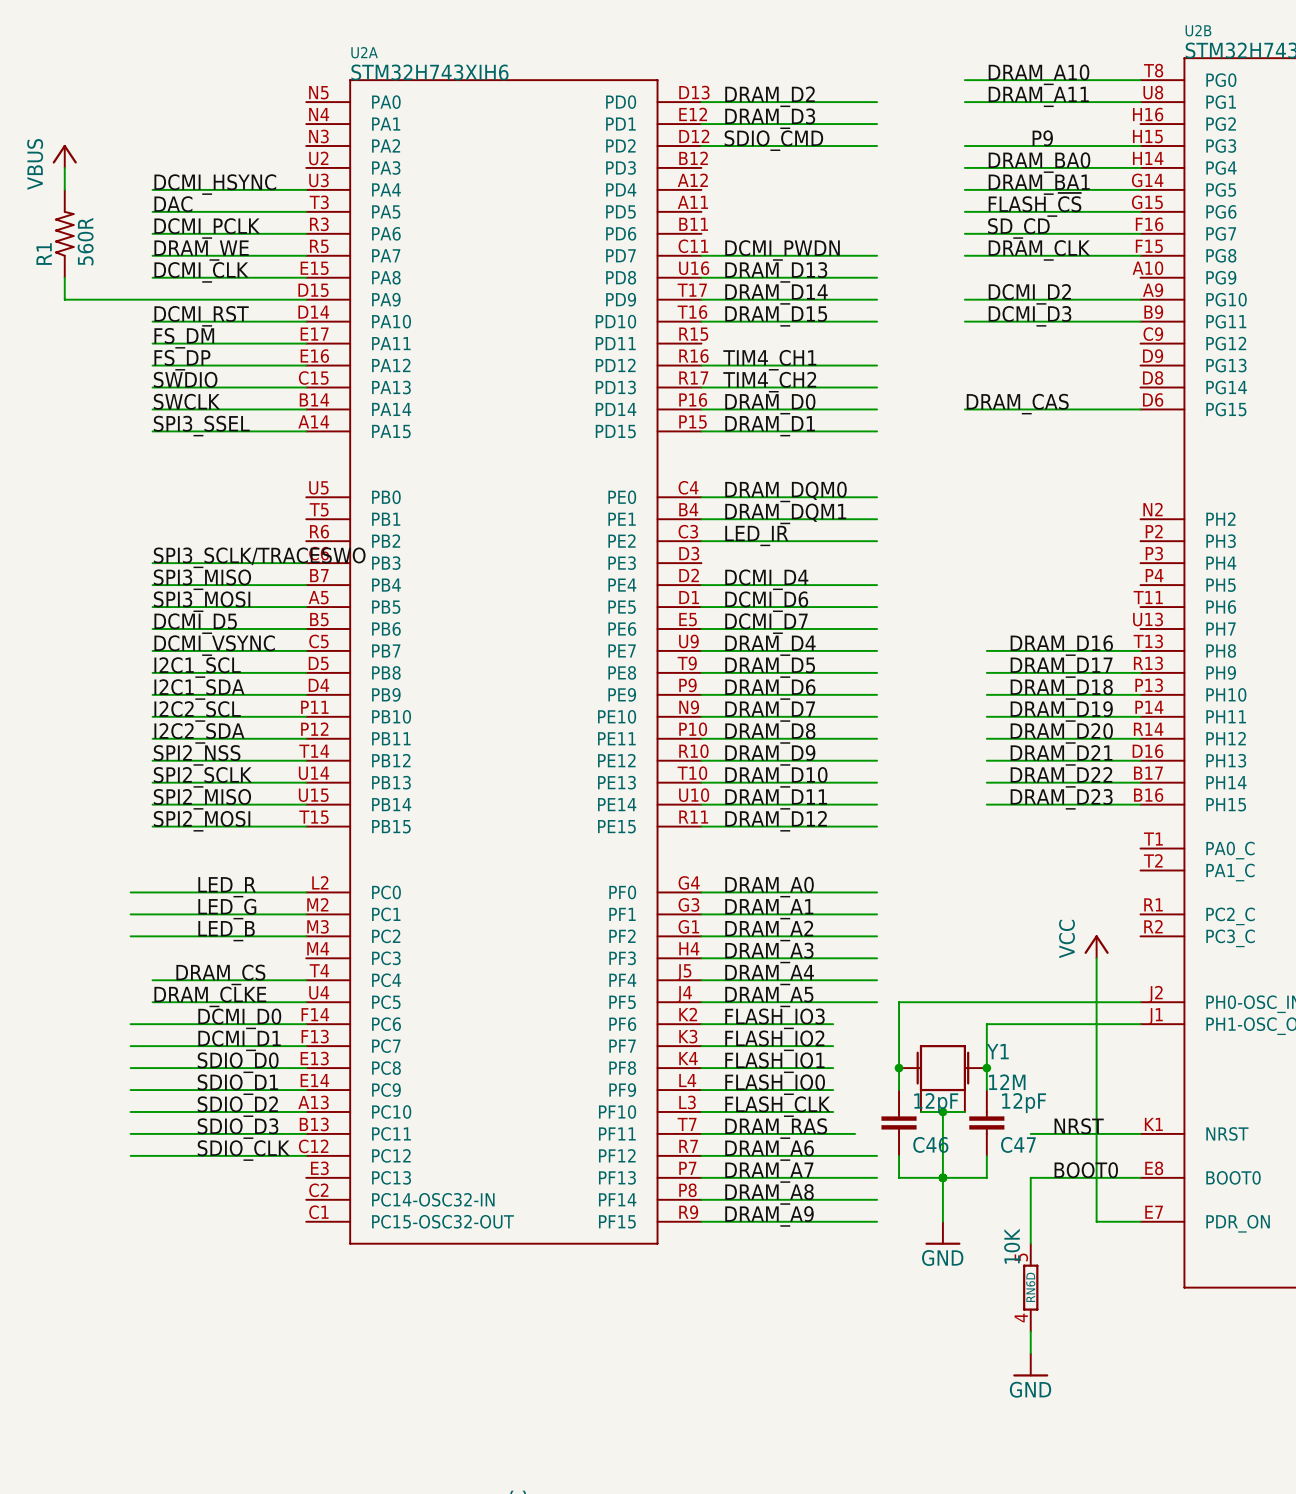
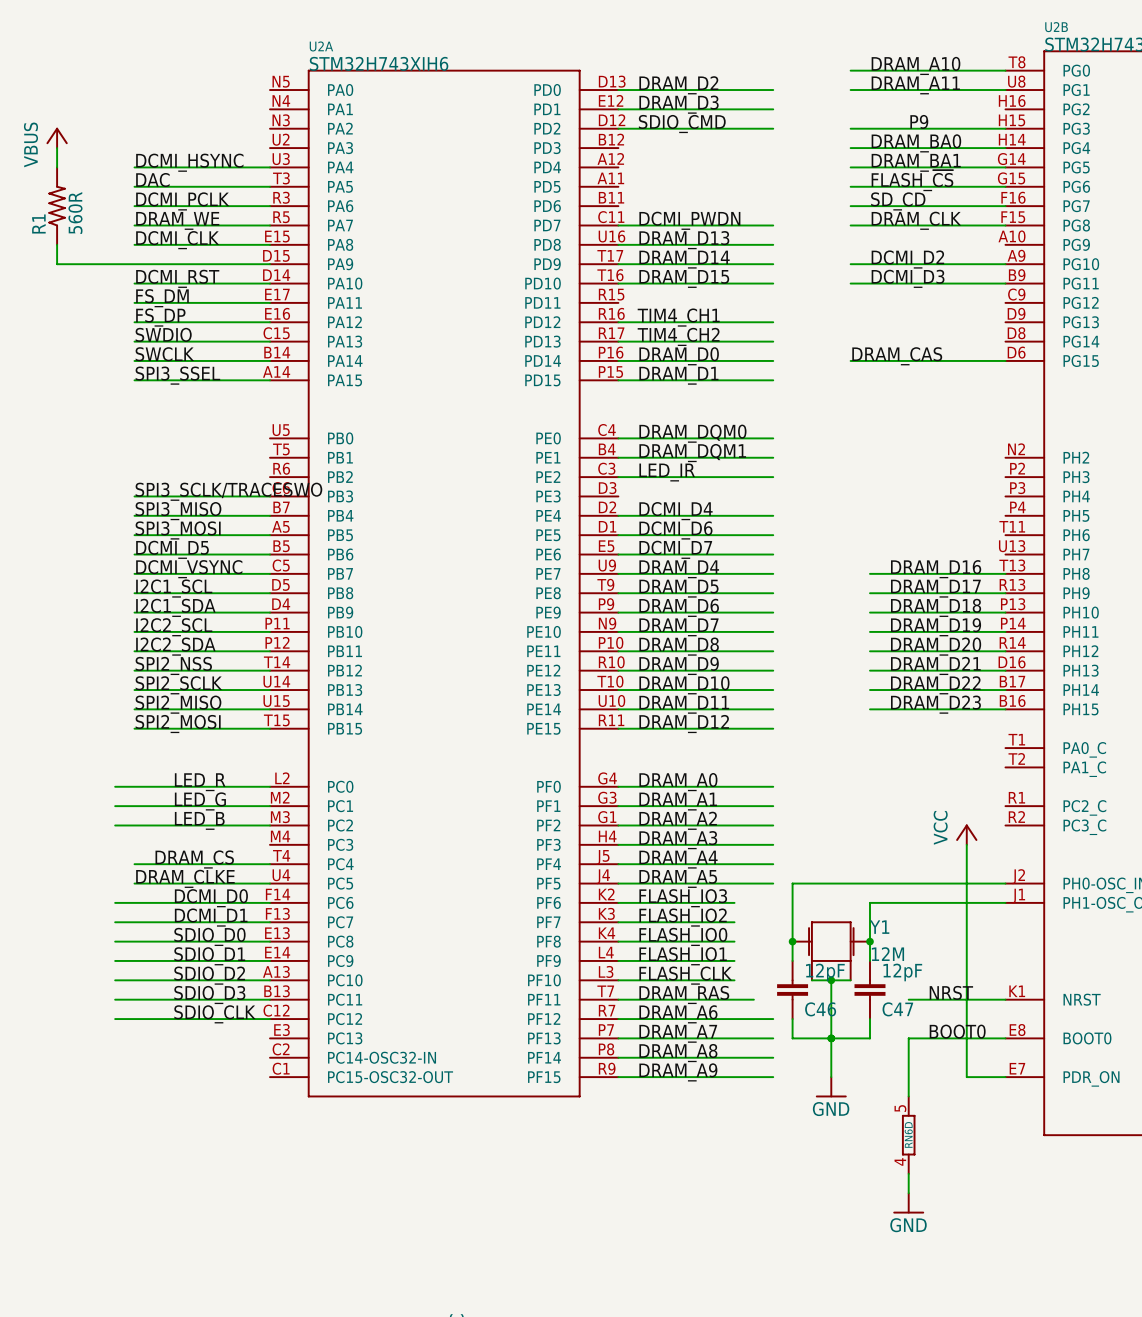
label: FLASH_IO1 (774, 1062) -> FLASH_IO0 (683, 936)
label: FLASH_IO0 (775, 1084) -> FLASH_IO1 (683, 956)
RN6D value: 10K (1012, 1246) -> none

